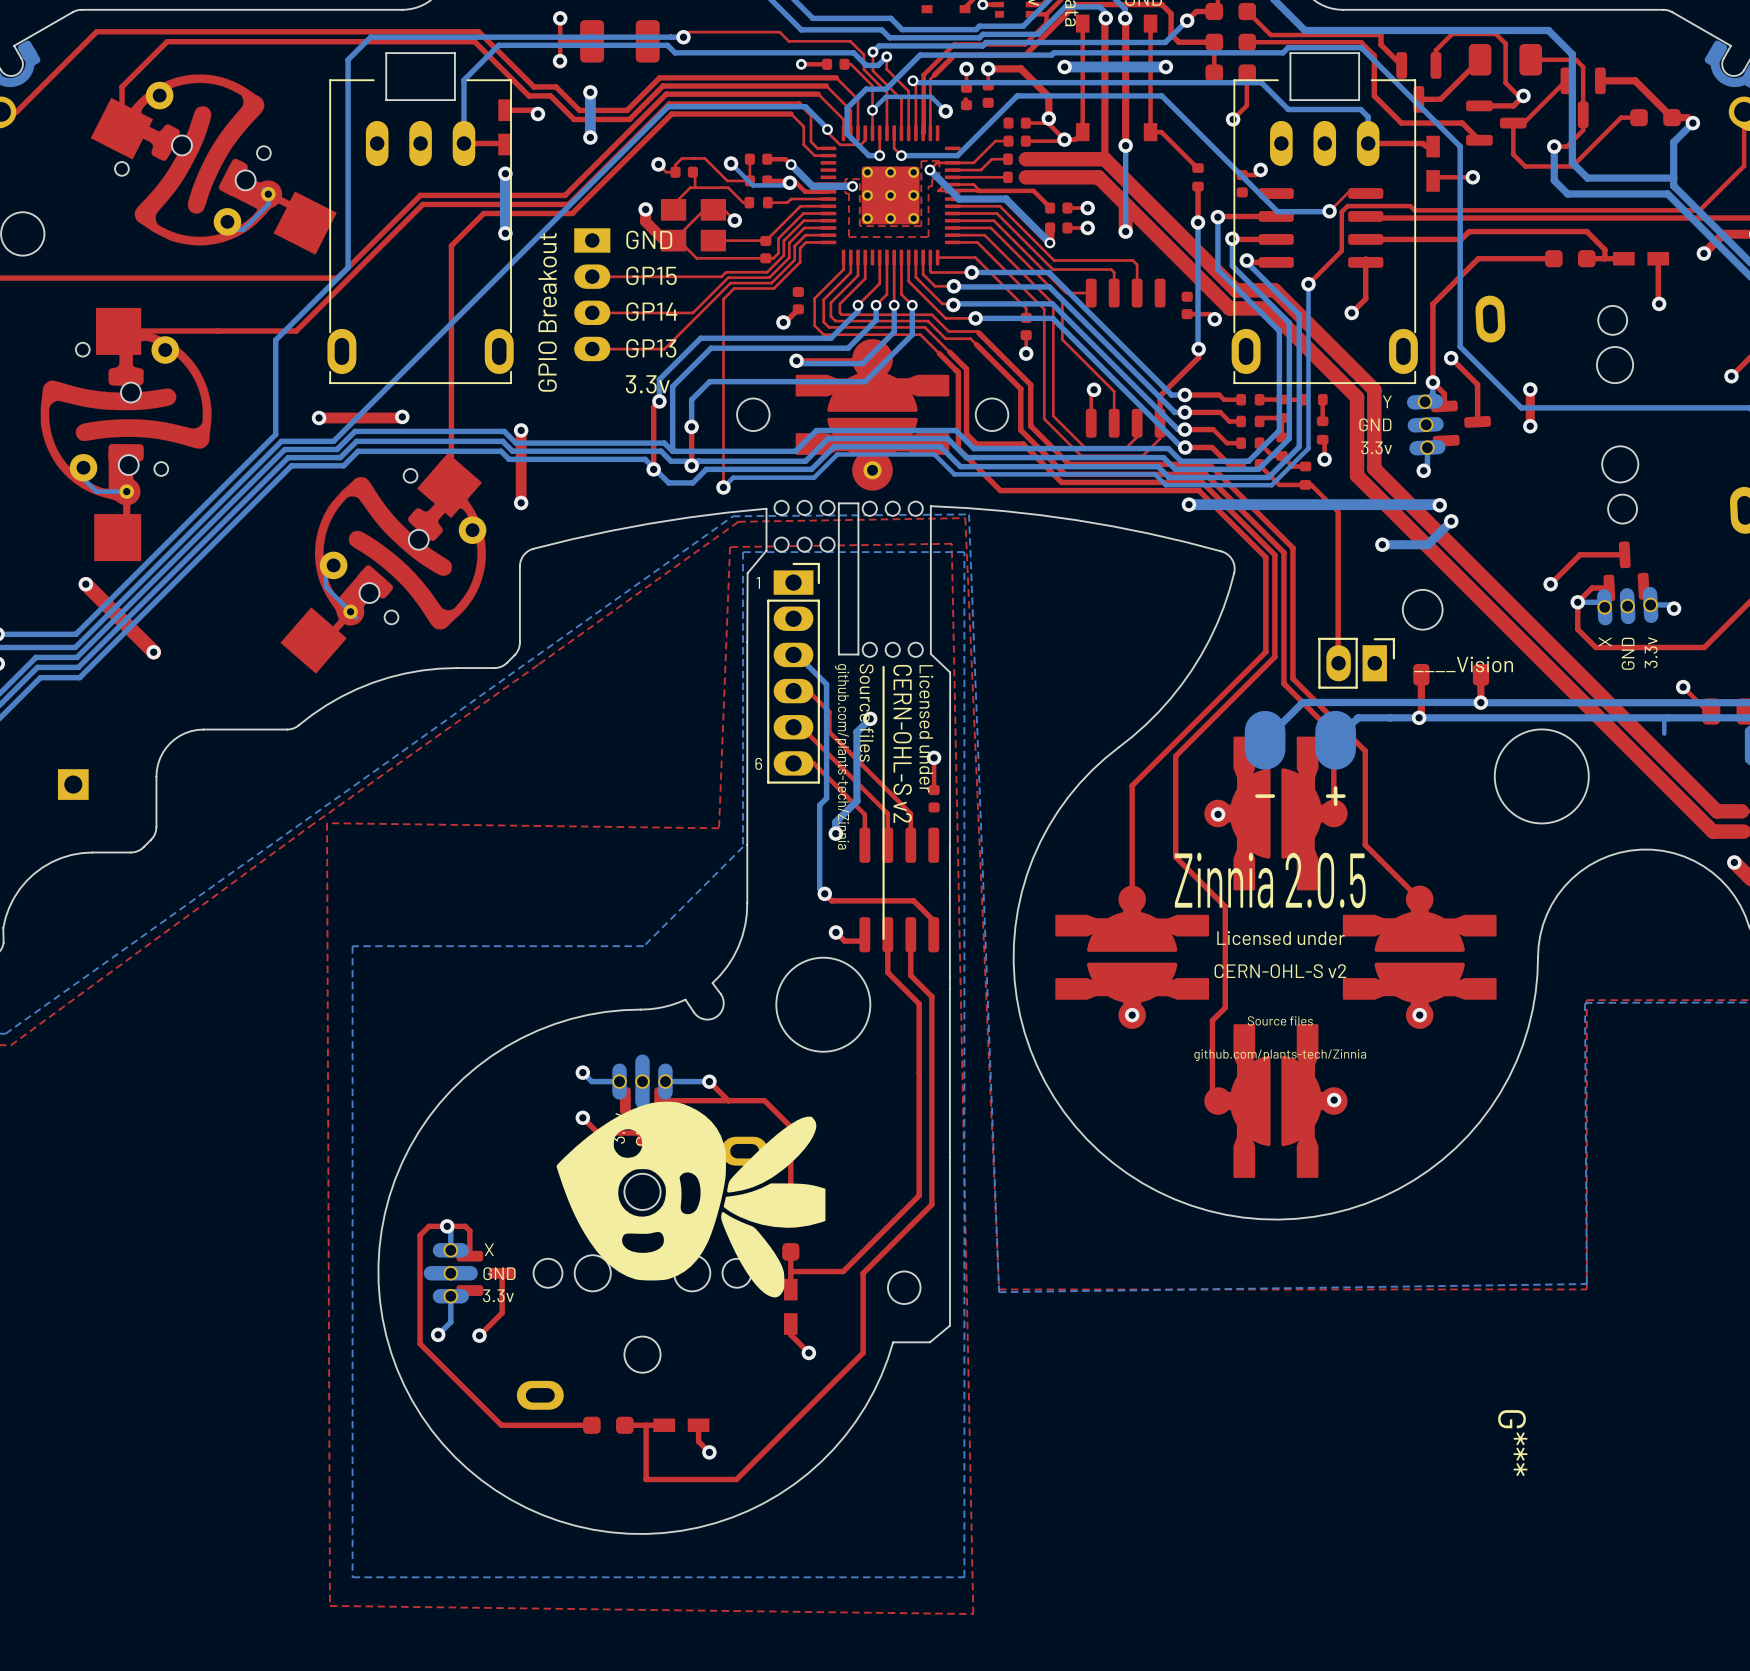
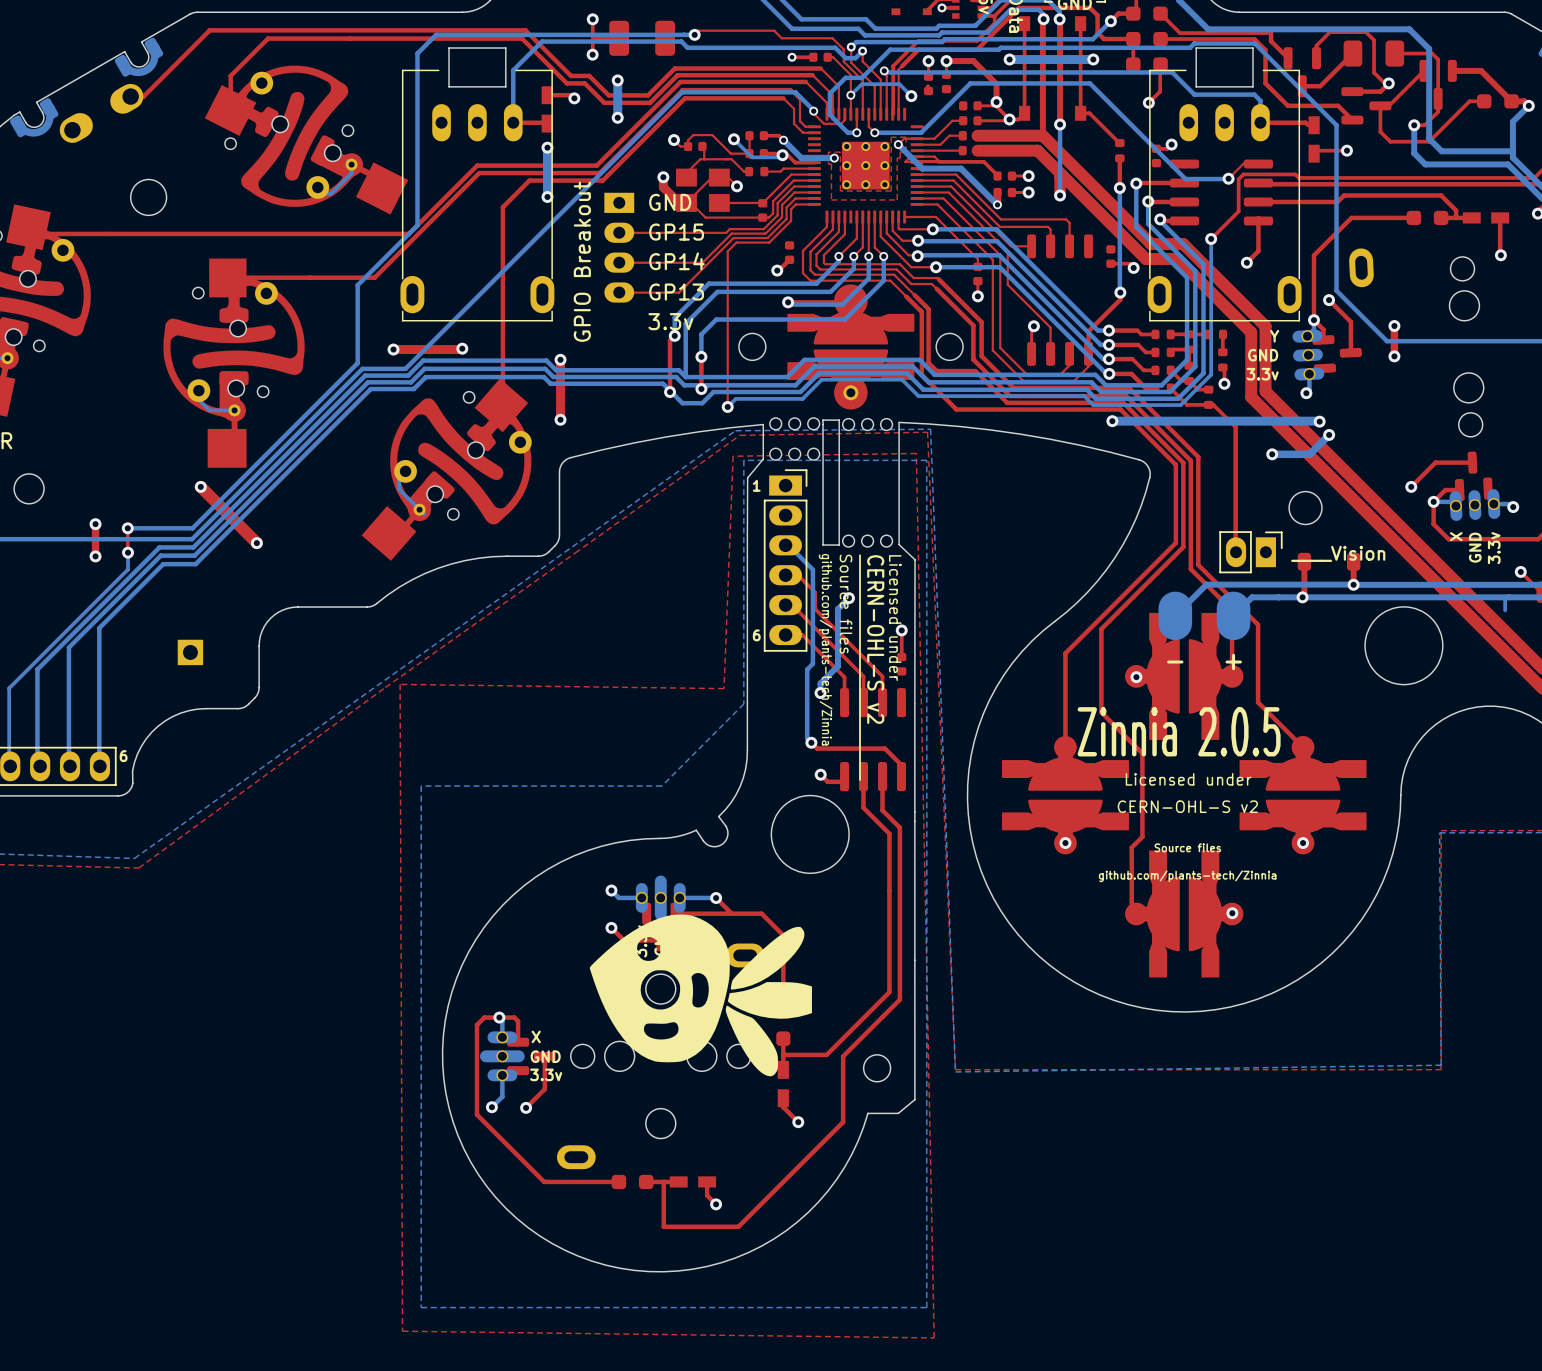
G***: (691, 1199) -> none

